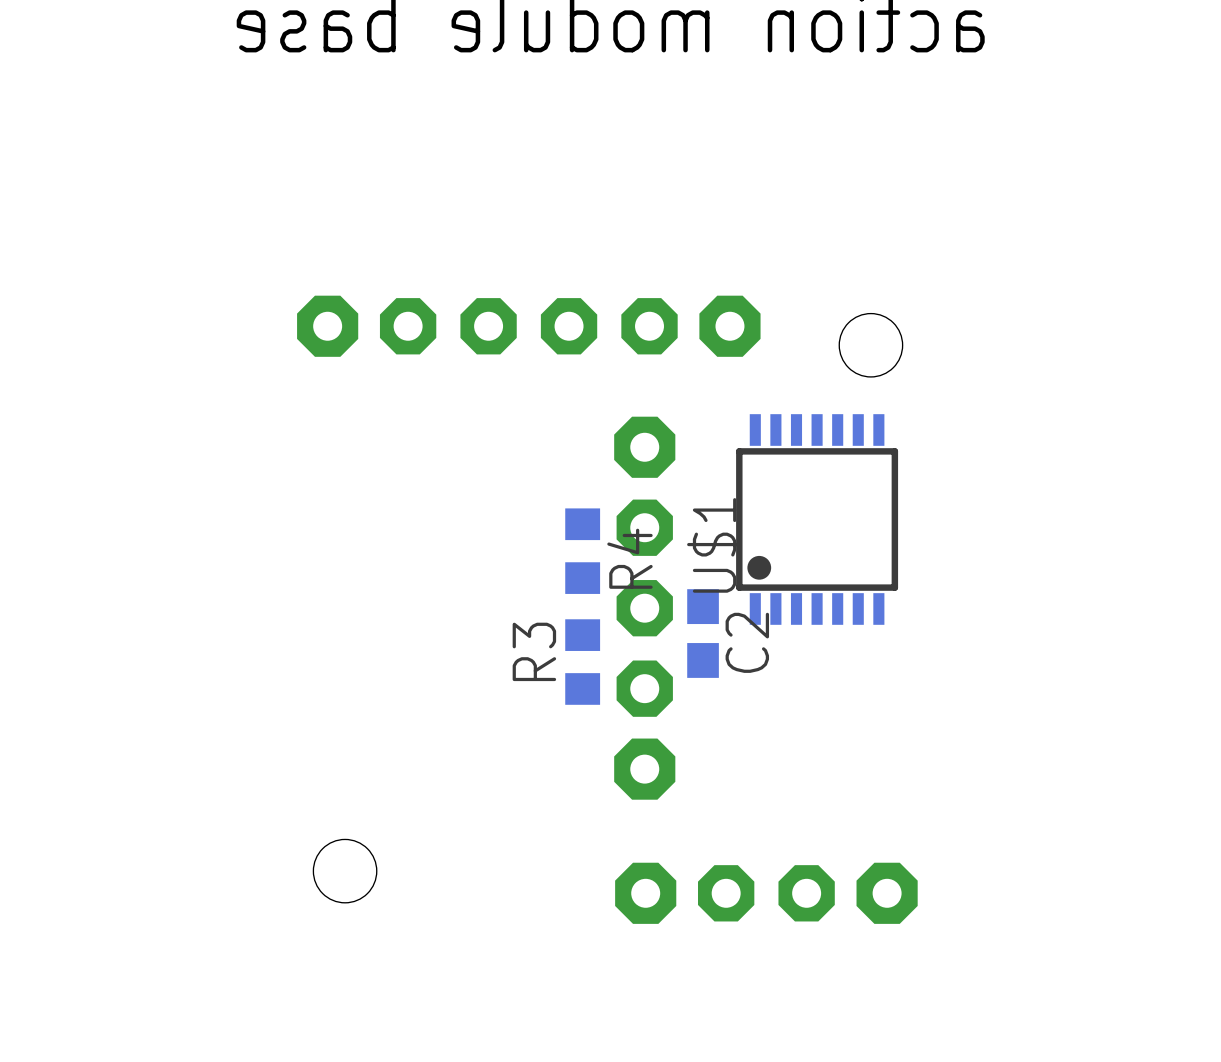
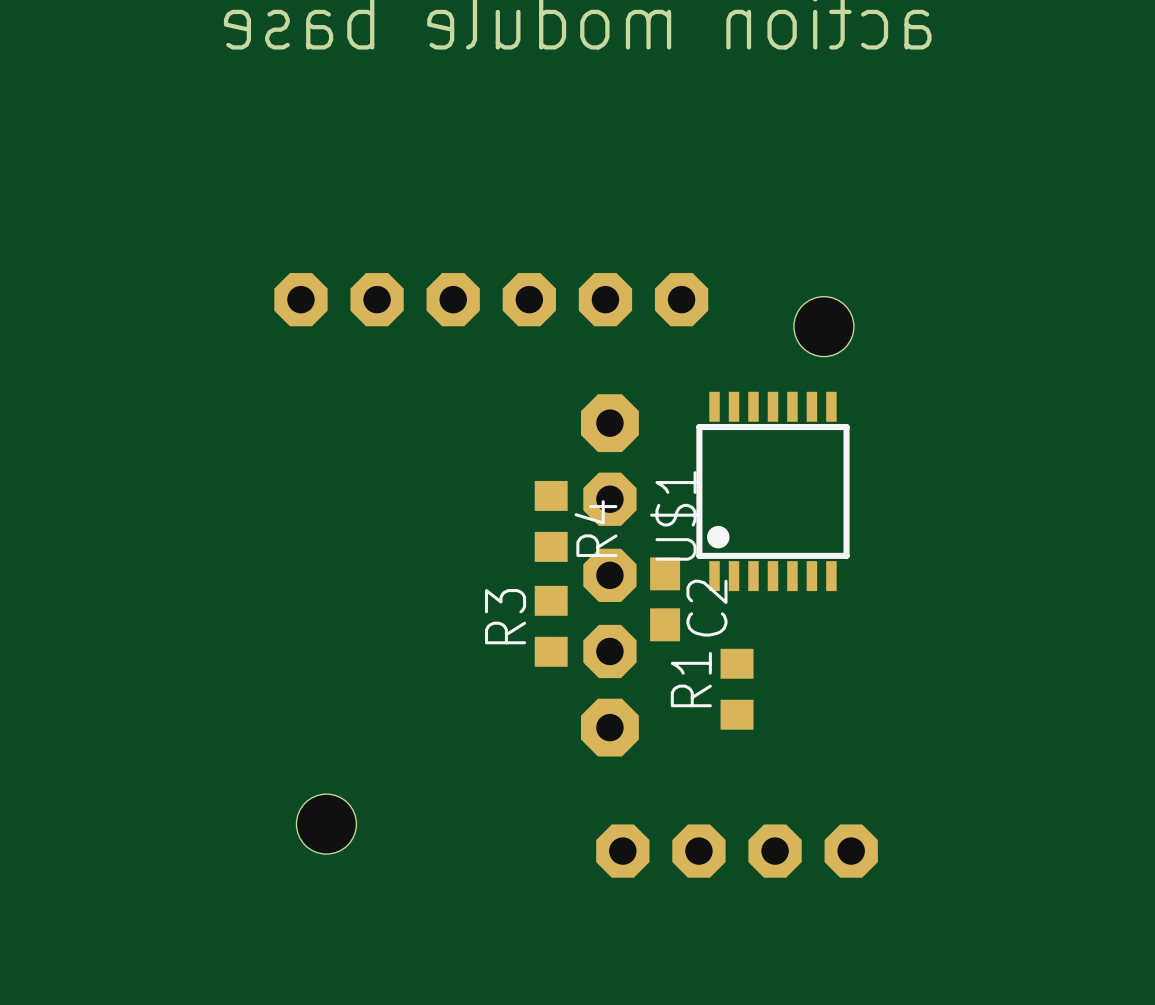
part footprint: [297, 295, 761, 357] -> [274, 273, 709, 327]
R1: none -> (737, 689)
part footprint: [615, 862, 918, 924] -> [596, 824, 878, 878]

